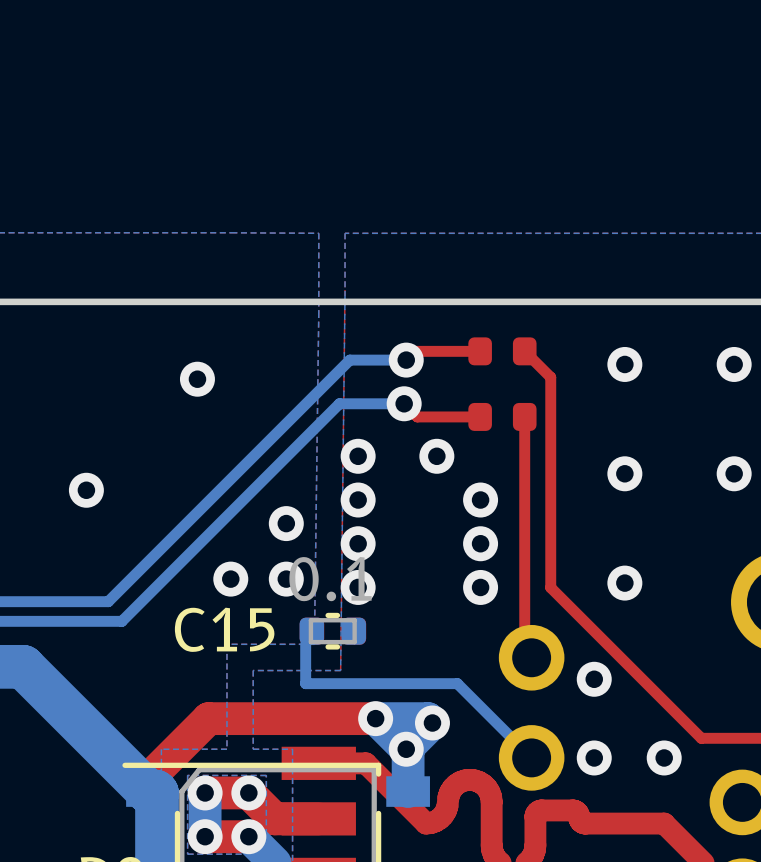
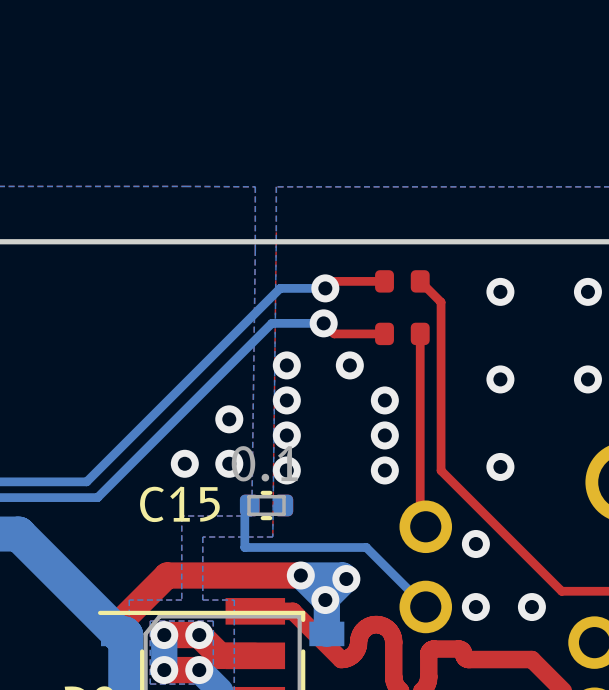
via: (197, 379) -> none
via: (86, 490) -> none

